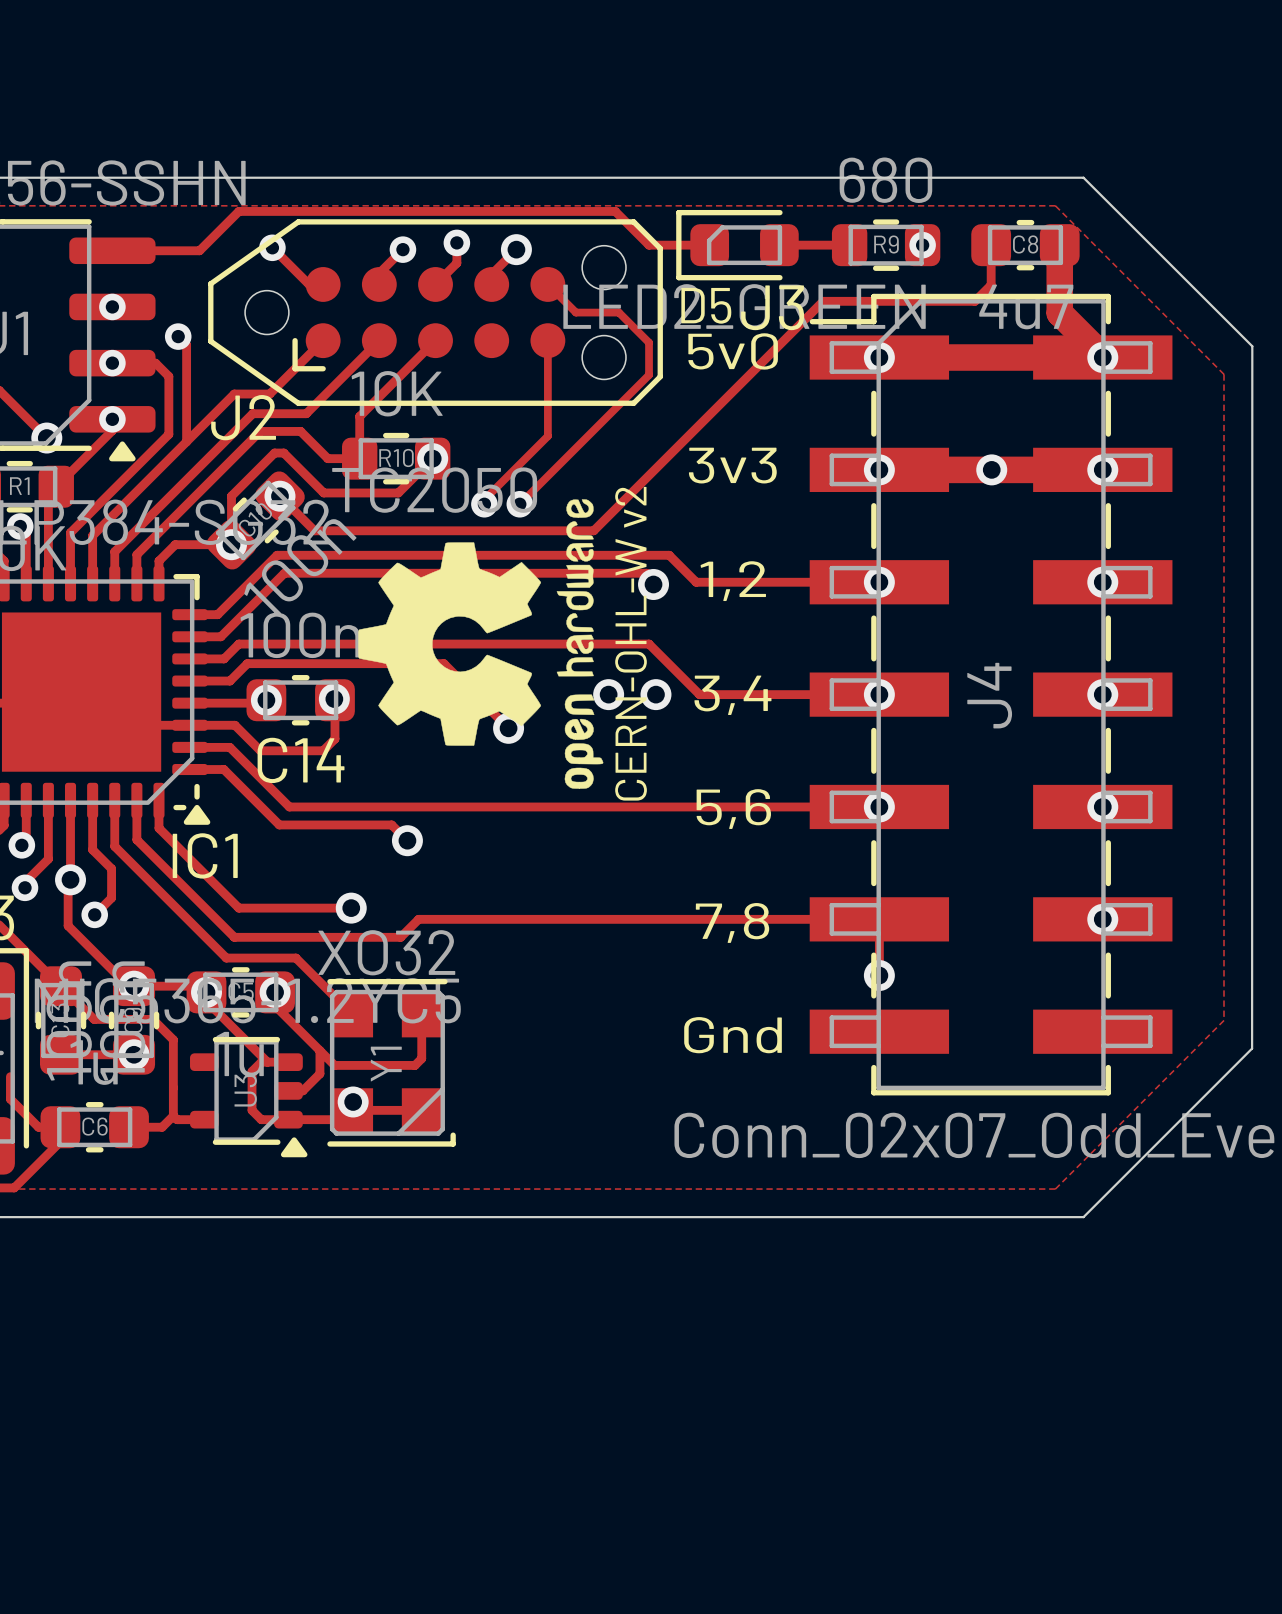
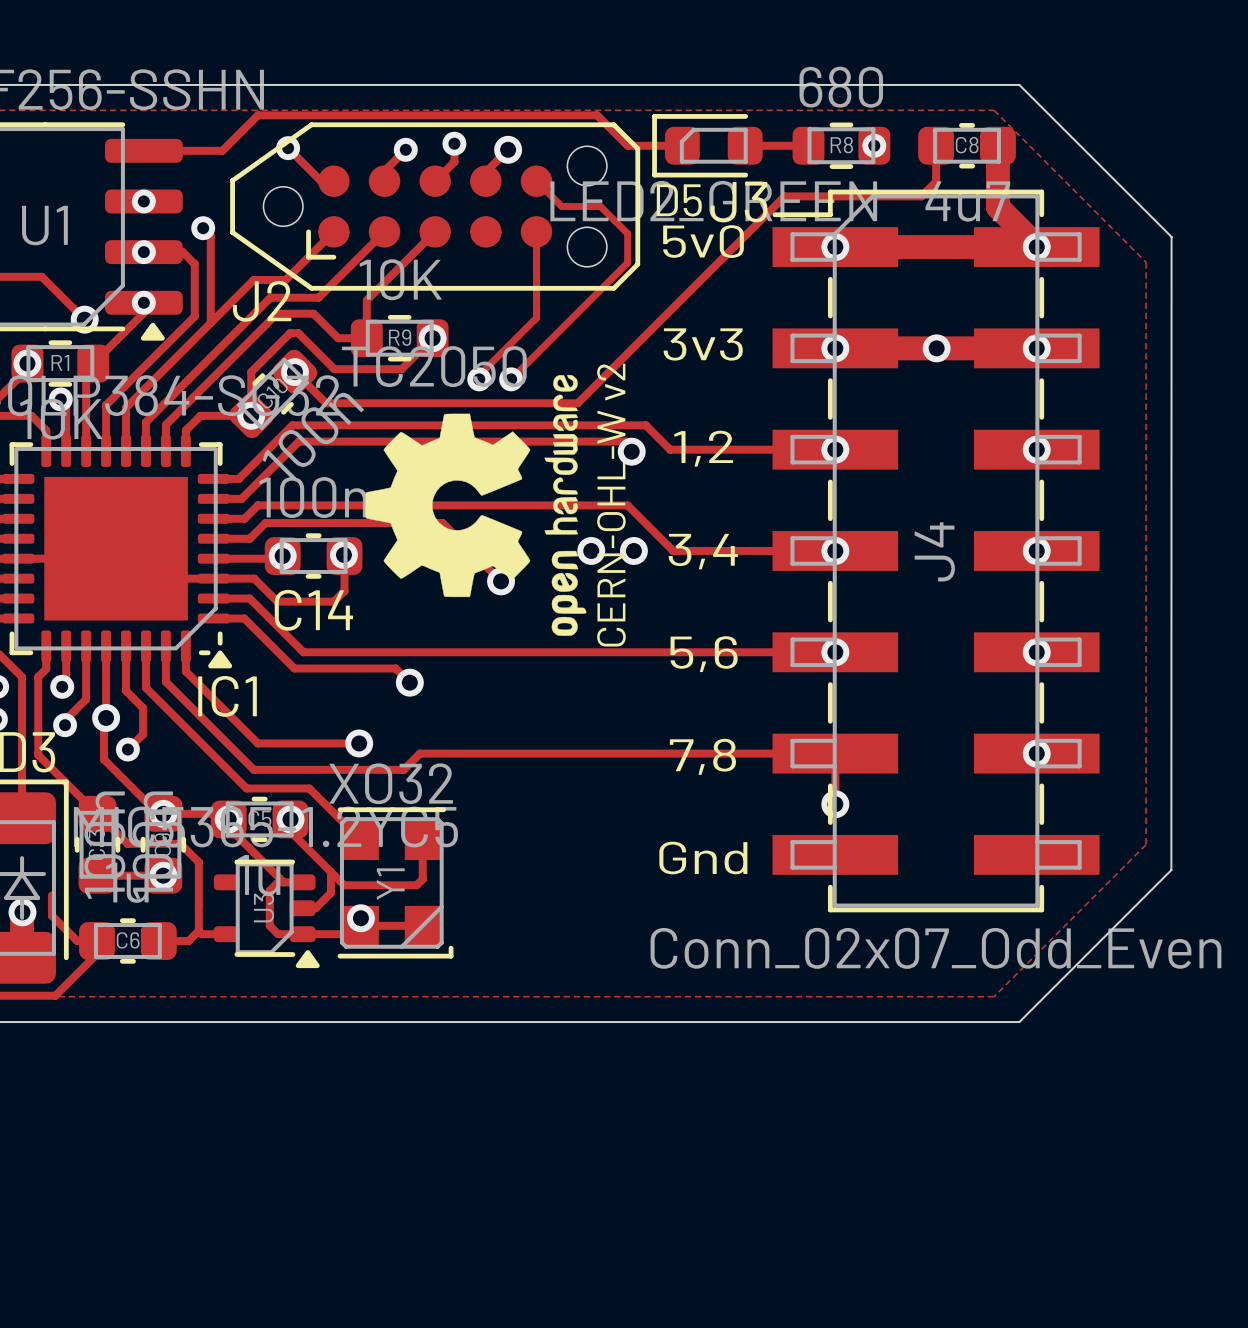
R9 name: R9 (886, 244) -> R8 (841, 145)
R10 name: R10 (396, 458) -> R9 (400, 337)

